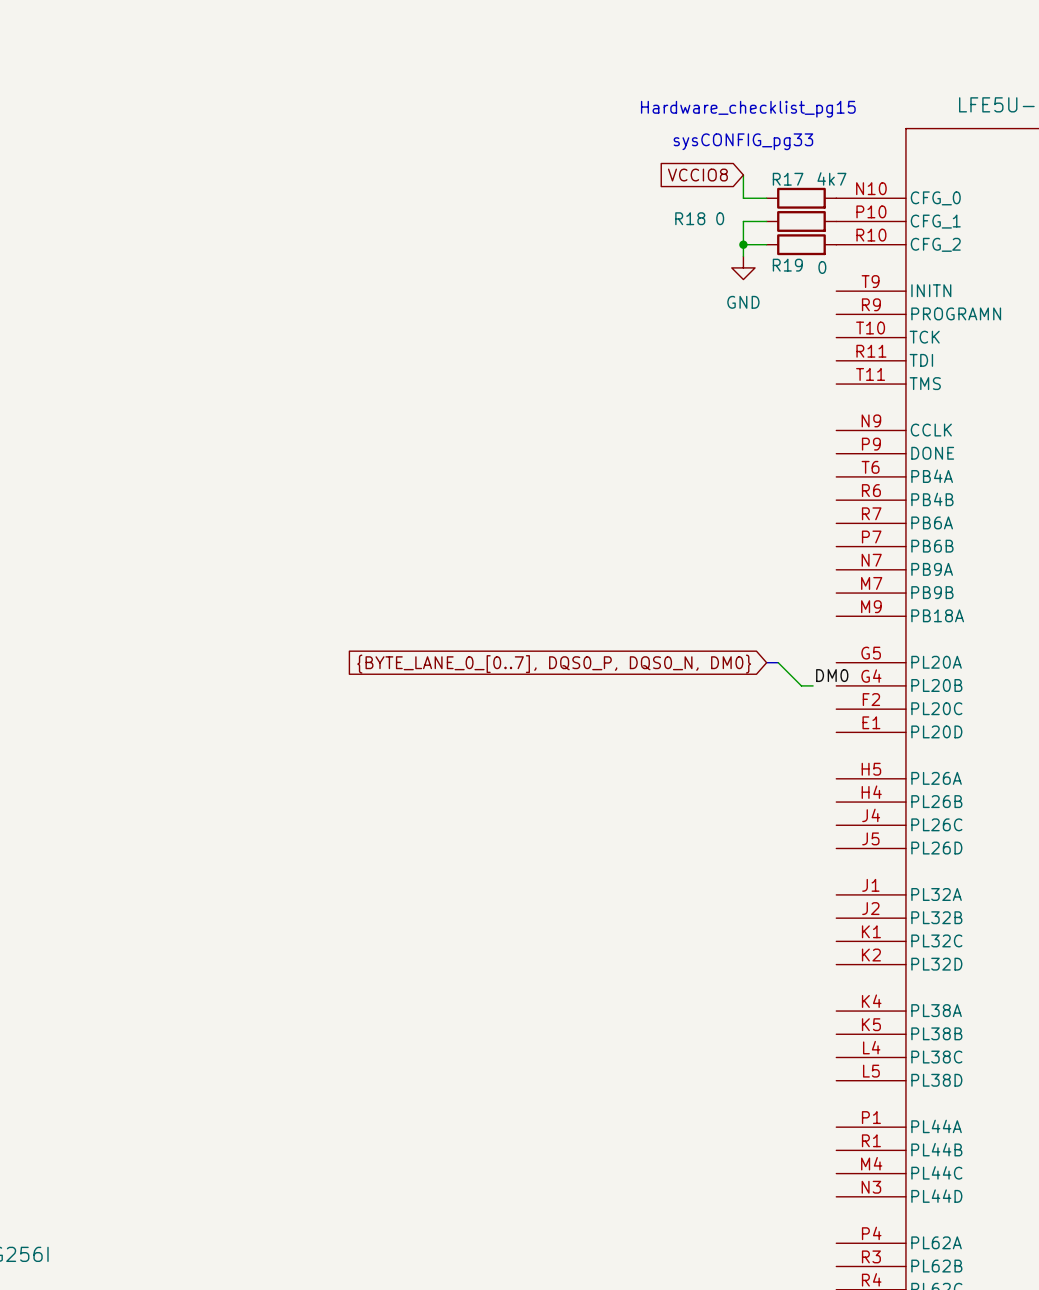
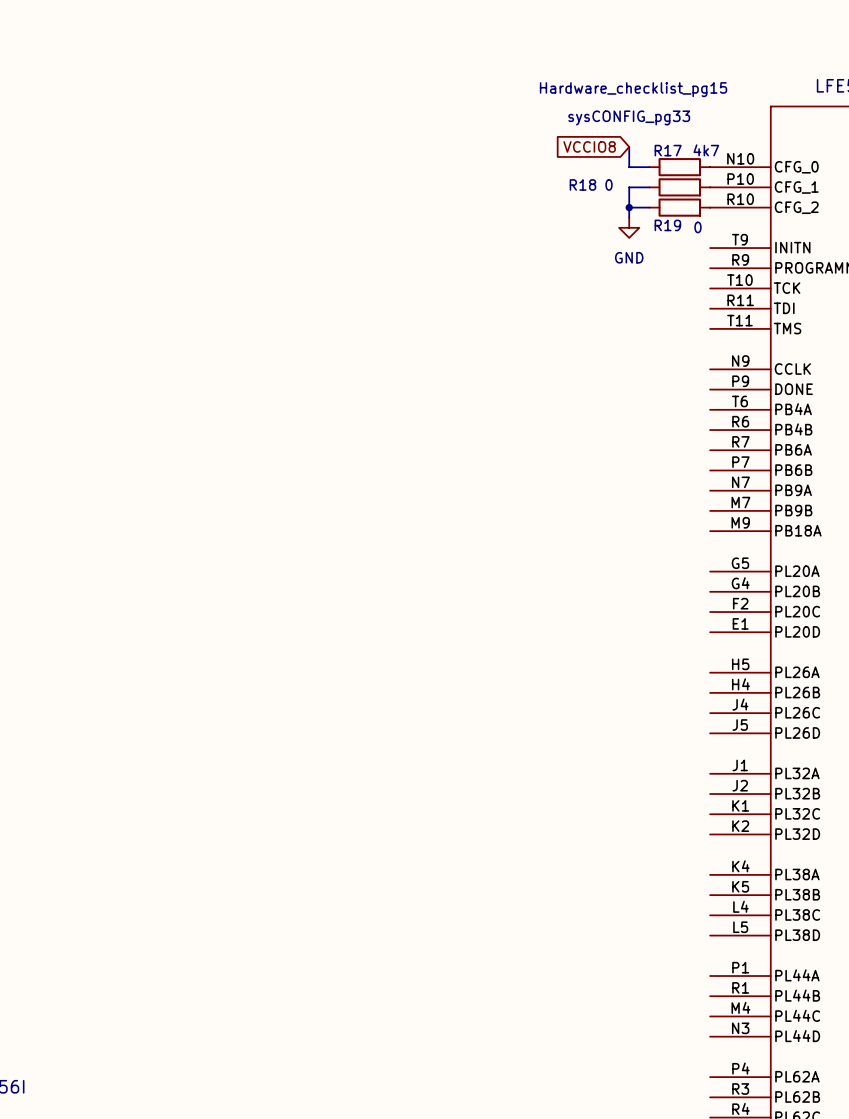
bus: (766, 662) (778, 662) -> none
wire: (778, 662) (801, 685) (813, 685) -> none
global label: {BYTE_LANE_0_[0..7], DQS0_P, DQS0_N, DM0} (554, 664) -> none
label: DM0 (832, 675) -> none

